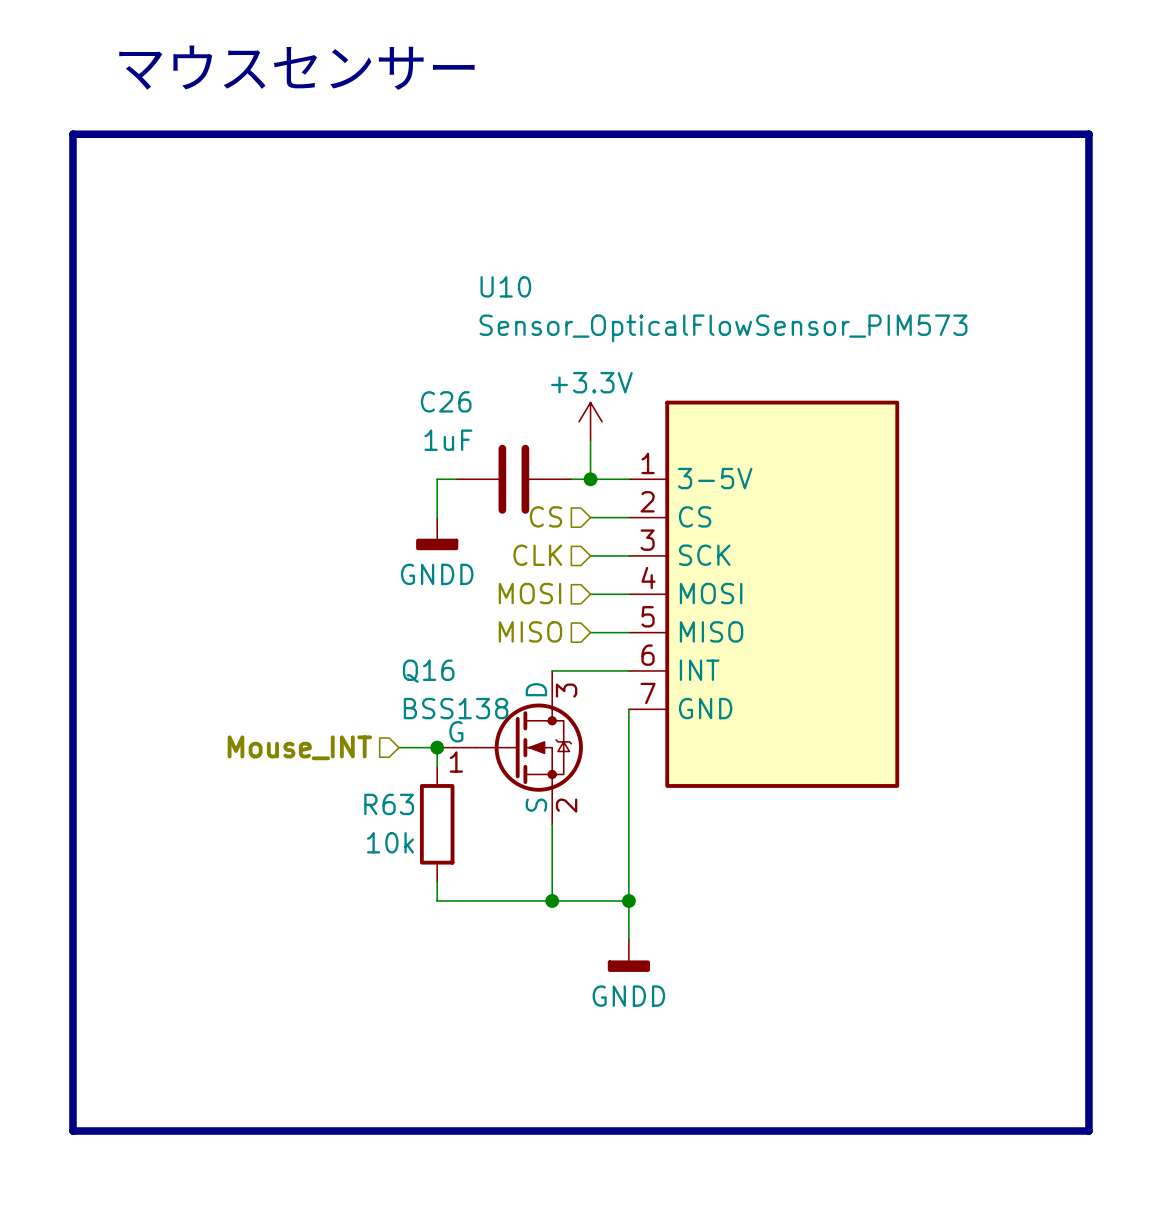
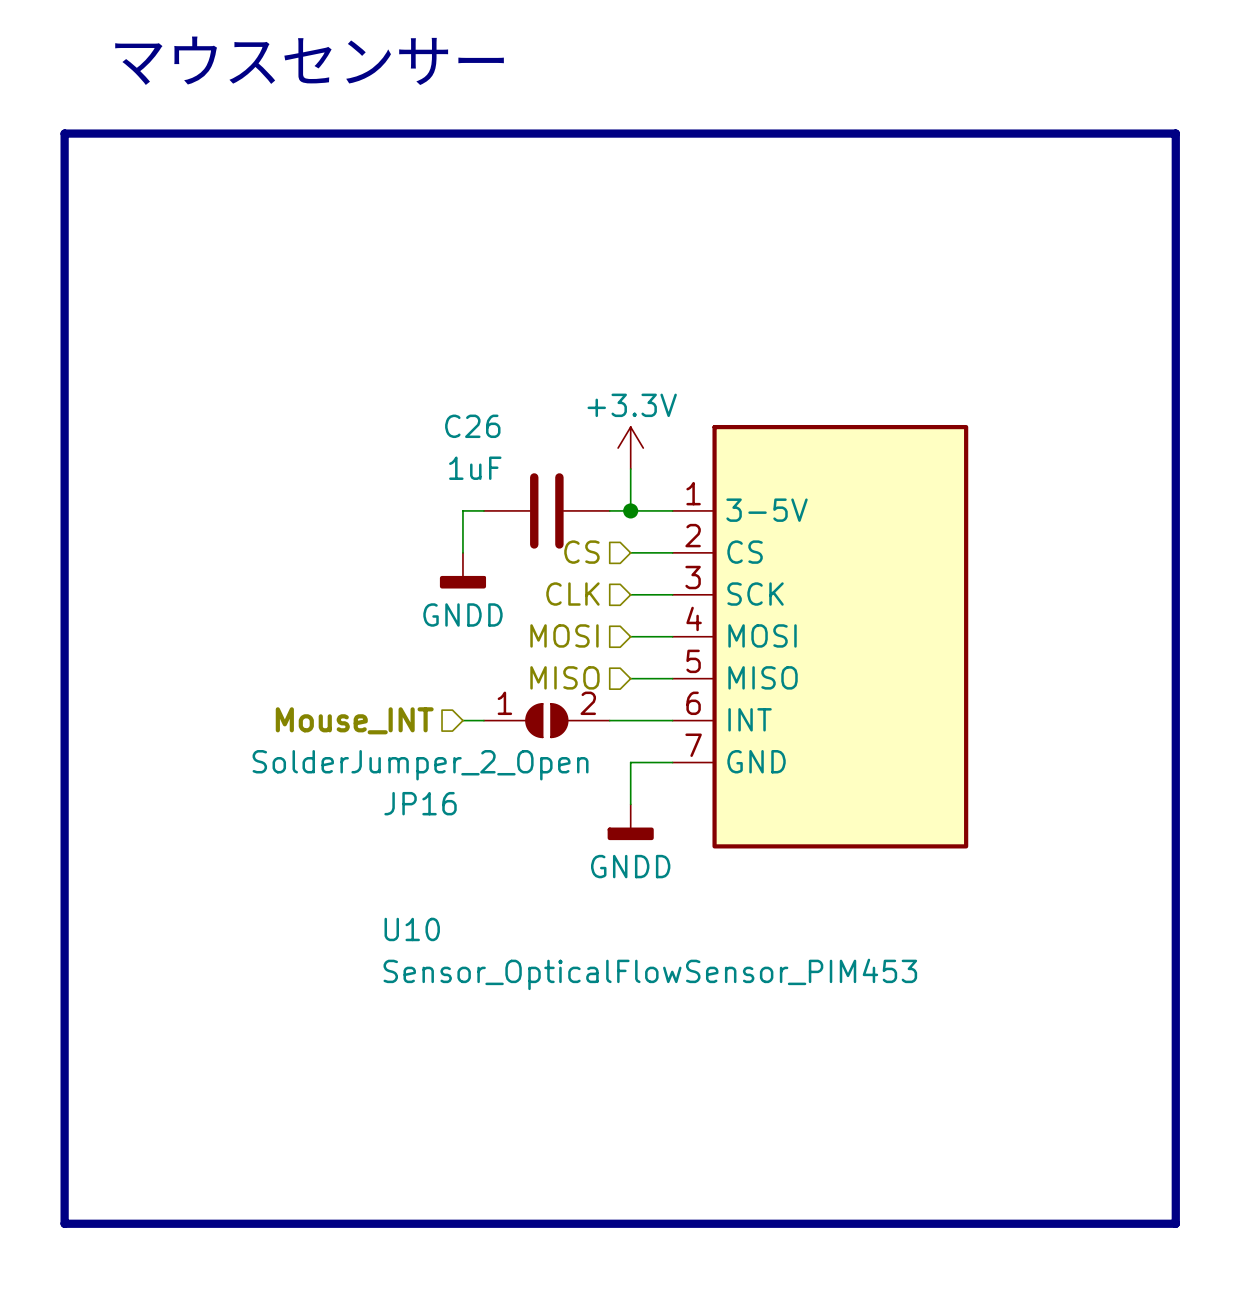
U10 name position: U10 (505, 286) -> U10 (412, 929)
U10 value: Sensor_OpticalFlowSensor_PIM573 (723, 328) -> Sensor_OpticalFlowSensor_PIM453 (650, 974)
JP16: none -> SolderJumper_2_Open (546, 720)
wire: (628, 709) (628, 939) -> (672, 762) (630, 762) (630, 804)
hierarchical label position: Mouse_INT (299, 747) -> Mouse_INT (354, 720)
wire: (398, 747) (437, 747) (437, 766) -> none
junction: (437, 747) -> none
Q16: BSS138 (510, 747) -> none
R63: 10k (437, 824) -> none
wire: (552, 824) (552, 900) -> none
wire: (437, 881) (437, 900) (628, 900) -> none
junction: (552, 900) -> none
junction: (628, 900) -> none
power symbol position: GNDD (628, 955) -> GNDD (630, 822)

